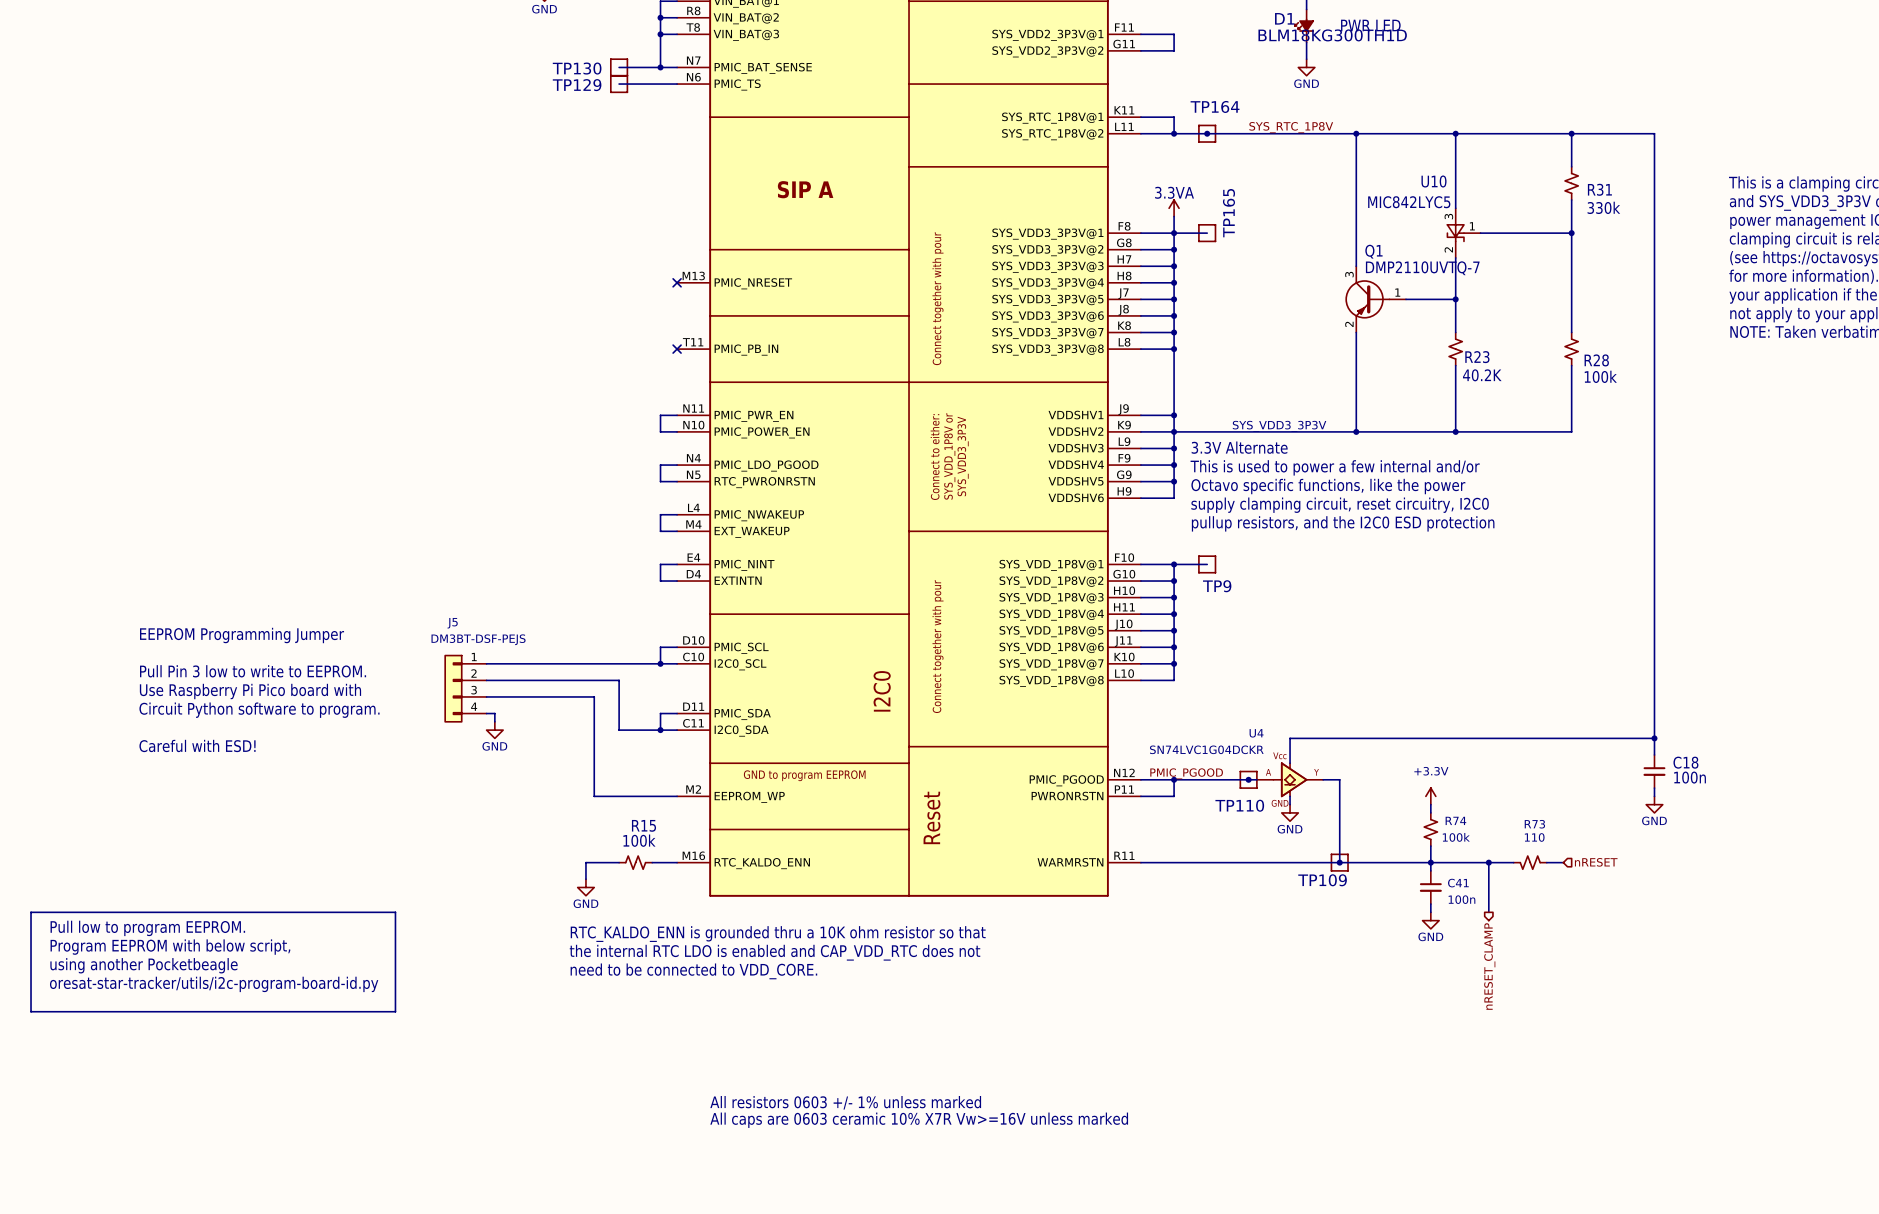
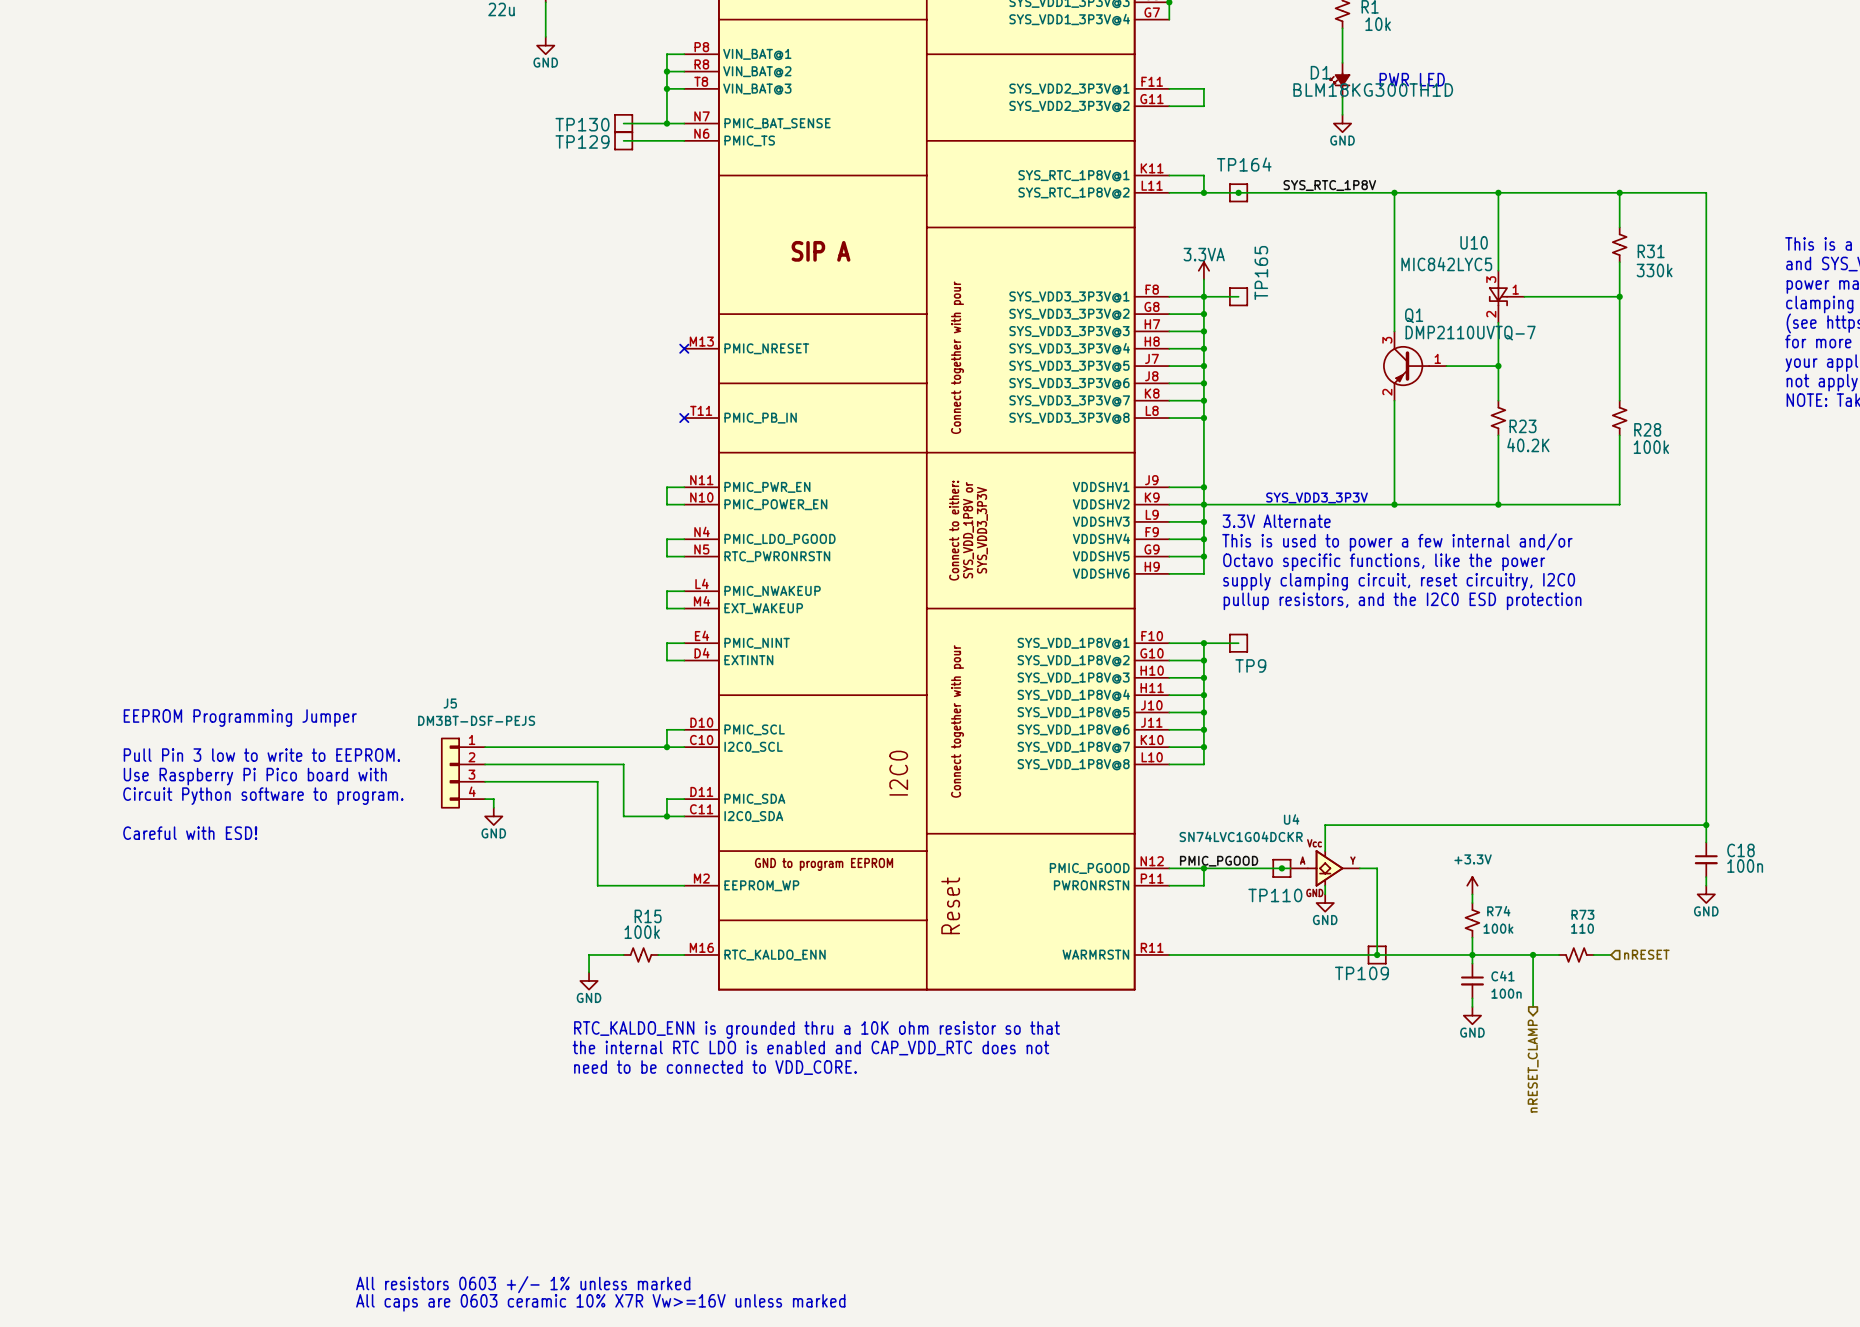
line: (31, 912) (31, 1011) (395, 1011) (395, 912) (31, 912) -> none
text: Pull low to program EEPROM. (147, 928) -> none
text: Program EEPROM with below script, (170, 947) -> none
text: using another Pocketbeagle (144, 965) -> none
text: oresat-star-tracker/utils/i2c-program-board-id.py (214, 984) -> none
text: All resistors 0603 +/- 1% unless marked (845, 1102) -> none
text: All caps are 0603 ceramic 10% X7R Vw>=16V unless marked (919, 1120) -> none
text: none -> All resistors 0603 +/- 1% unless marked (523, 1284)
text: none -> All caps are 0603 ceramic 10% X7R Vw>=16V unless marked (600, 1302)

